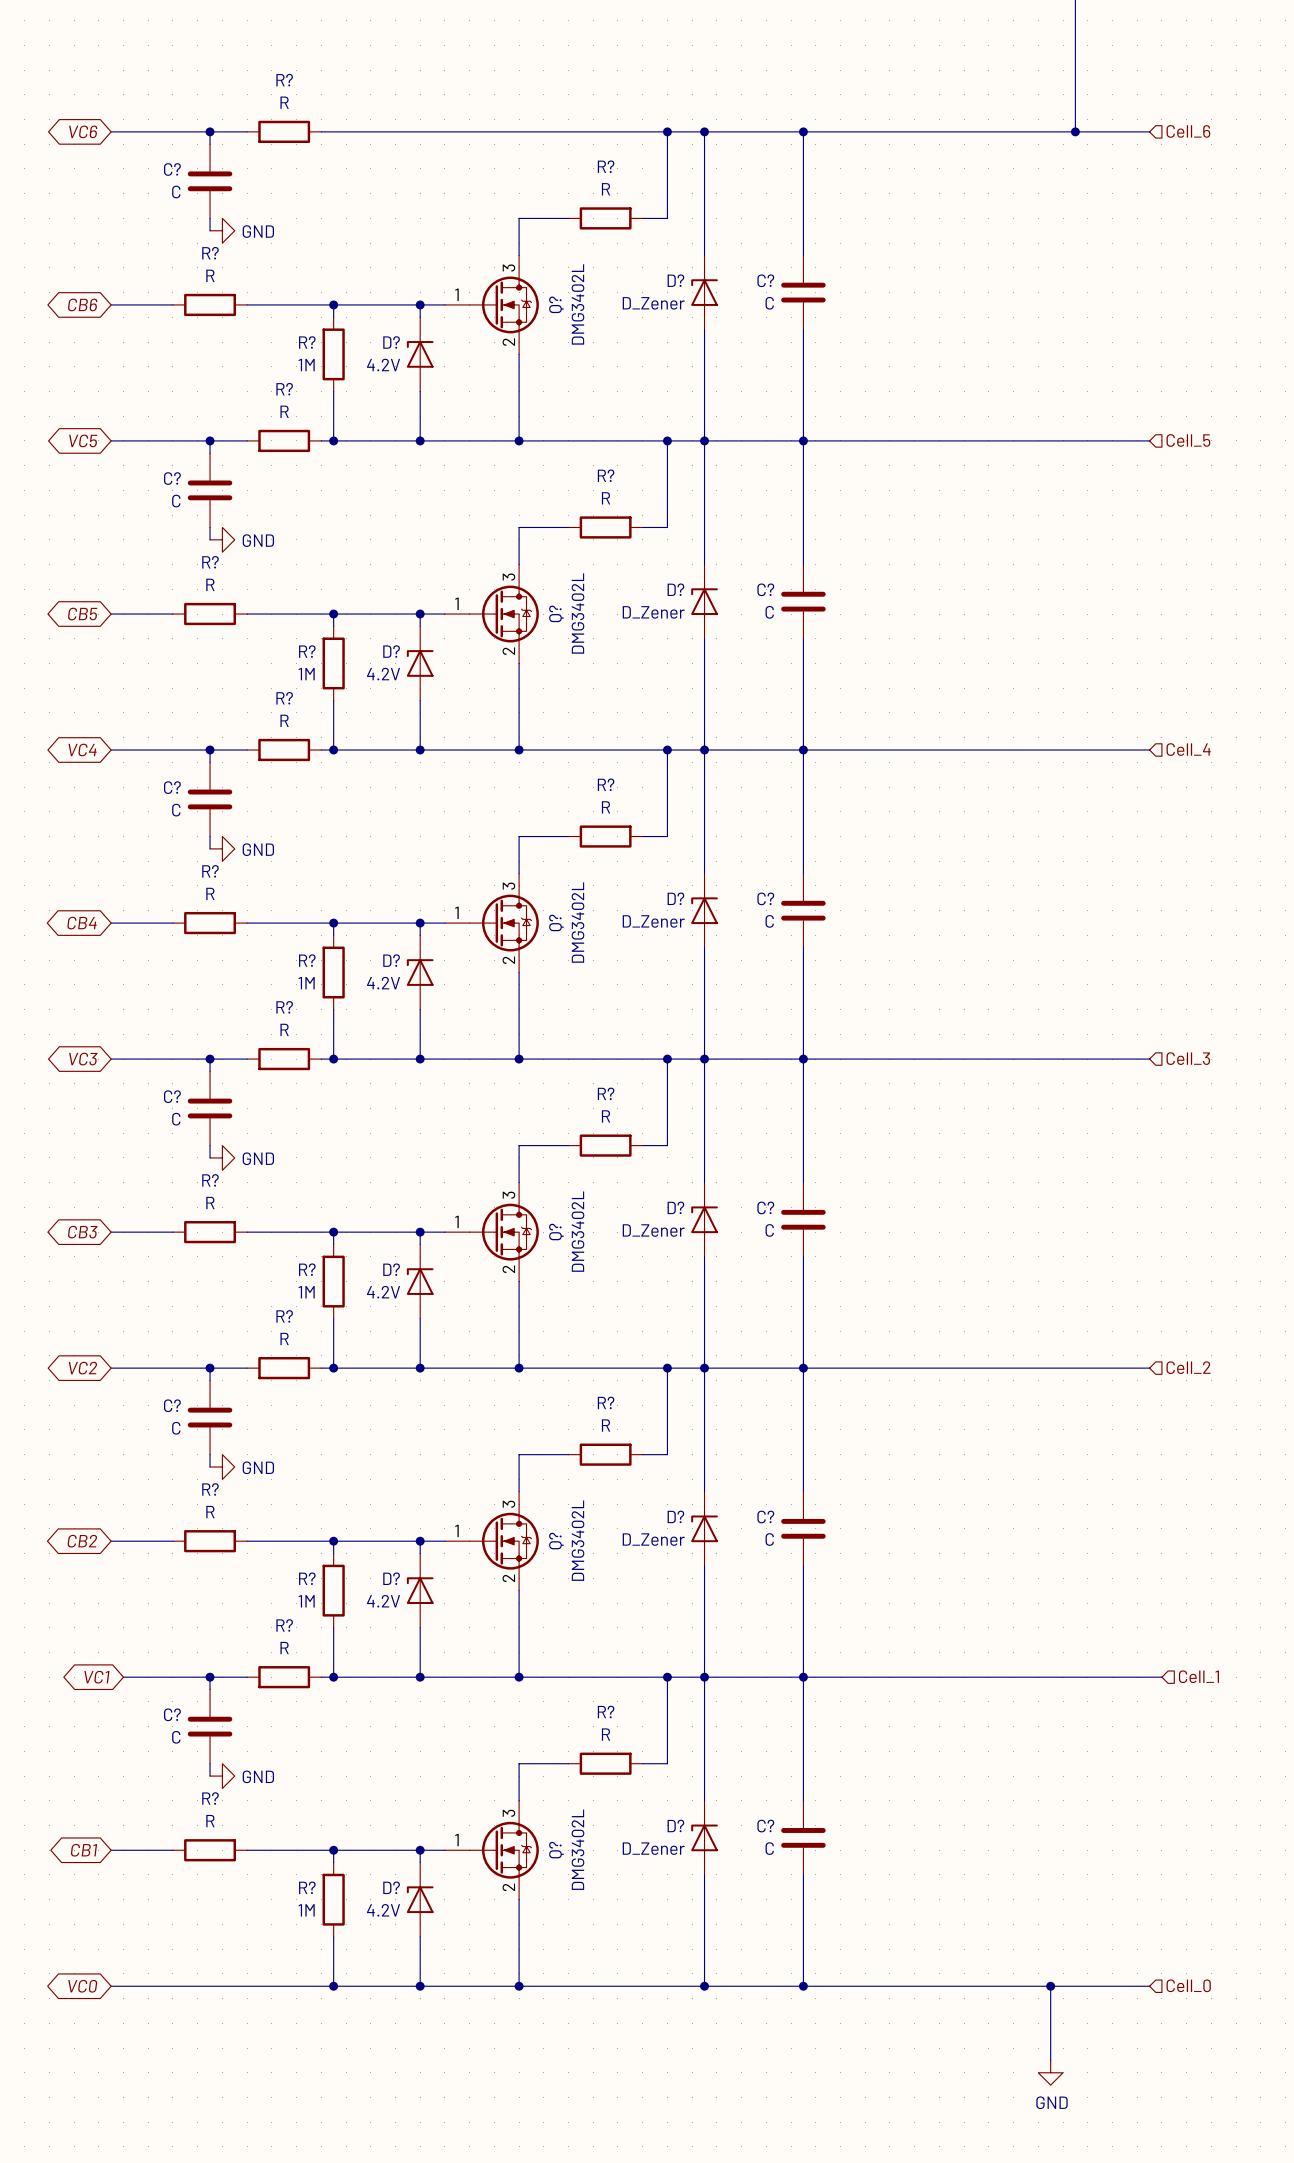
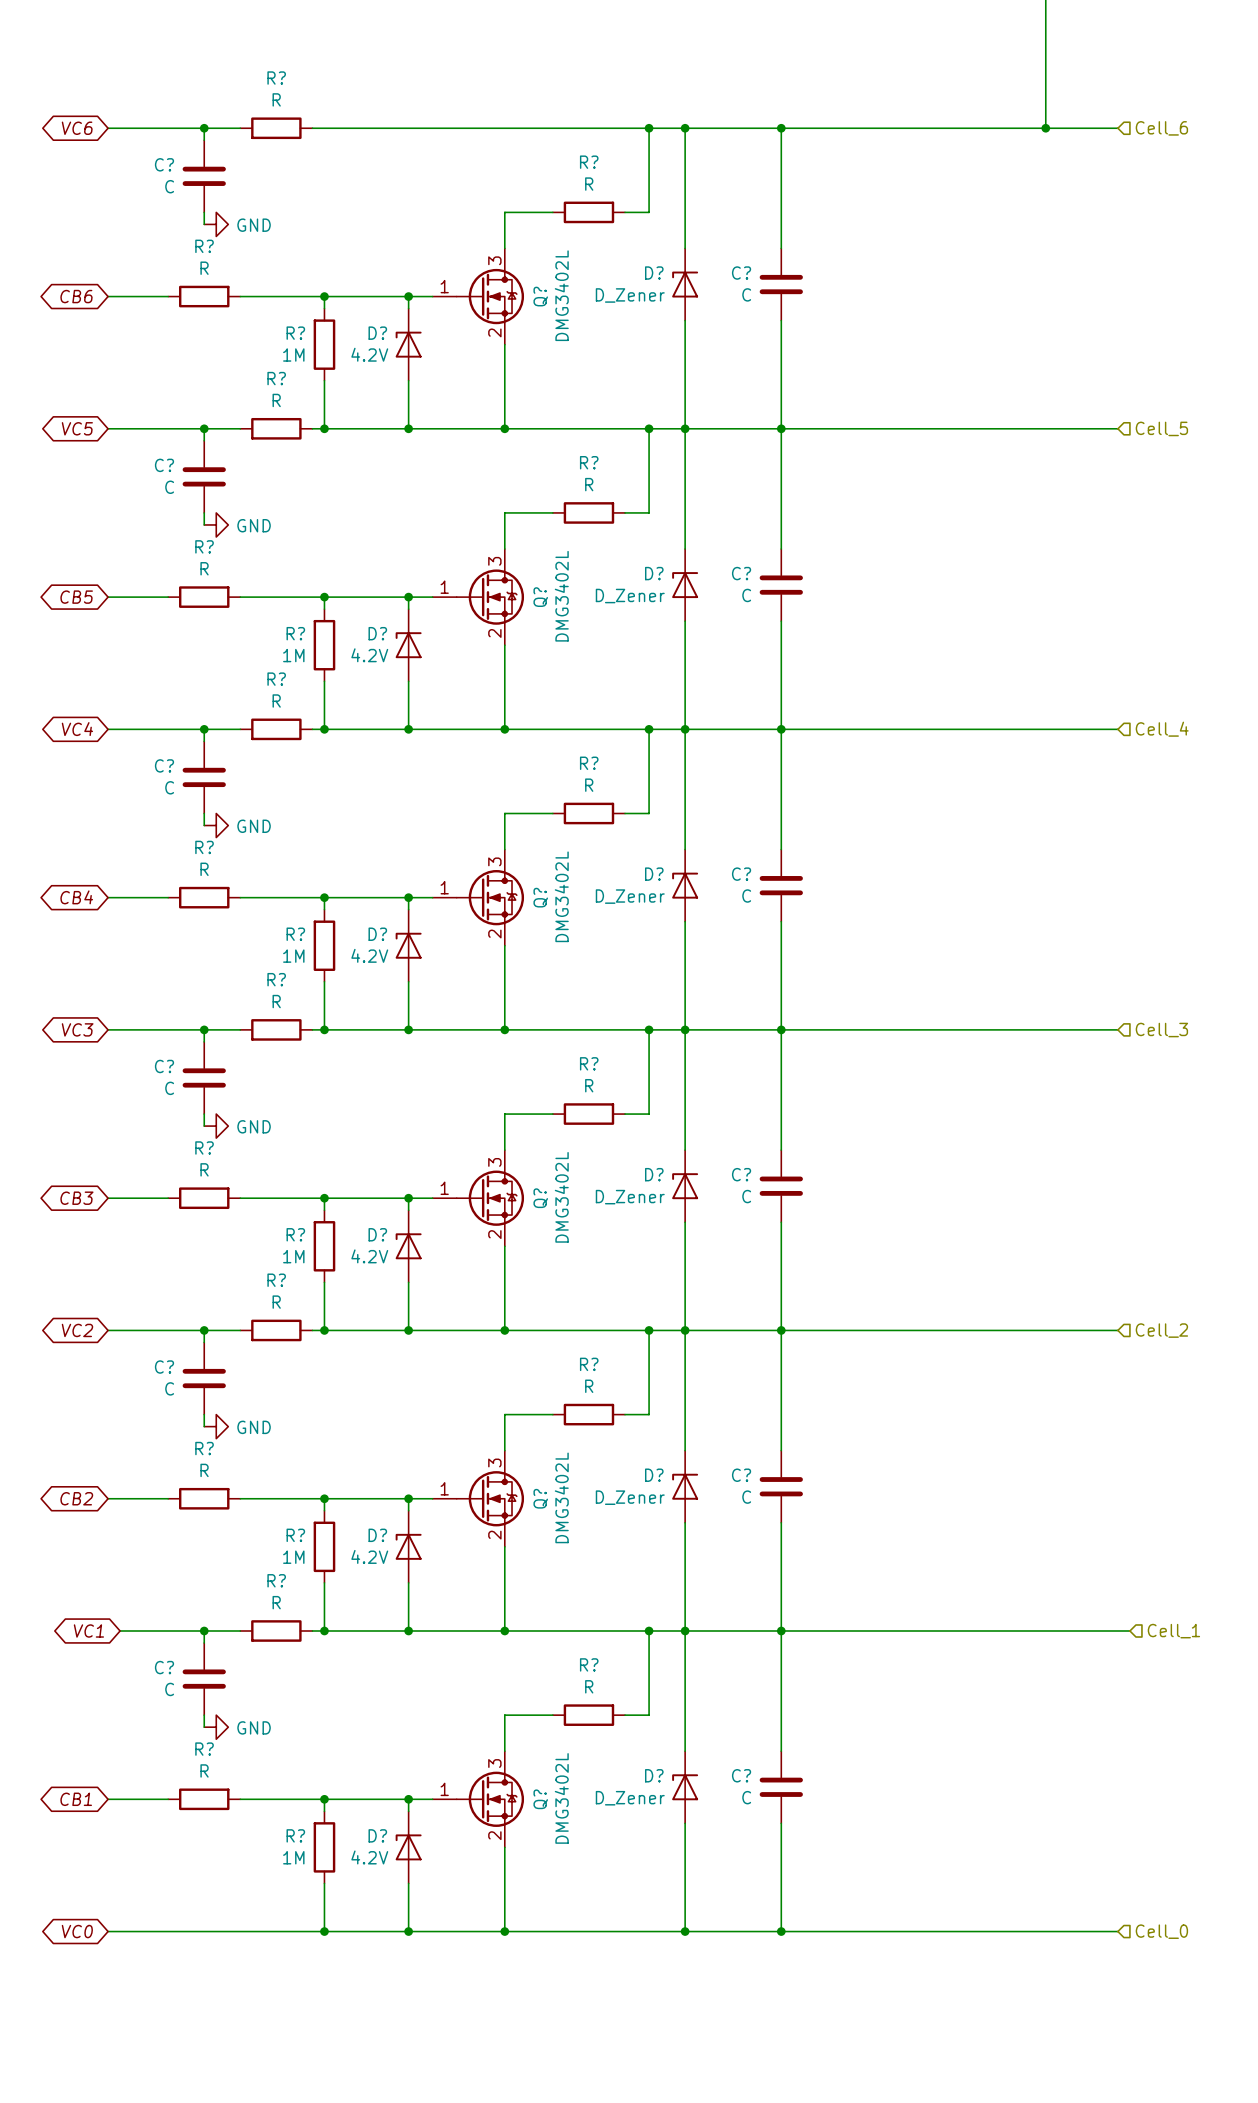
wire: (1050, 1986) (1050, 2060) -> none
junction: (1050, 1986) -> none
power symbol: GND (1050, 2072) -> none

